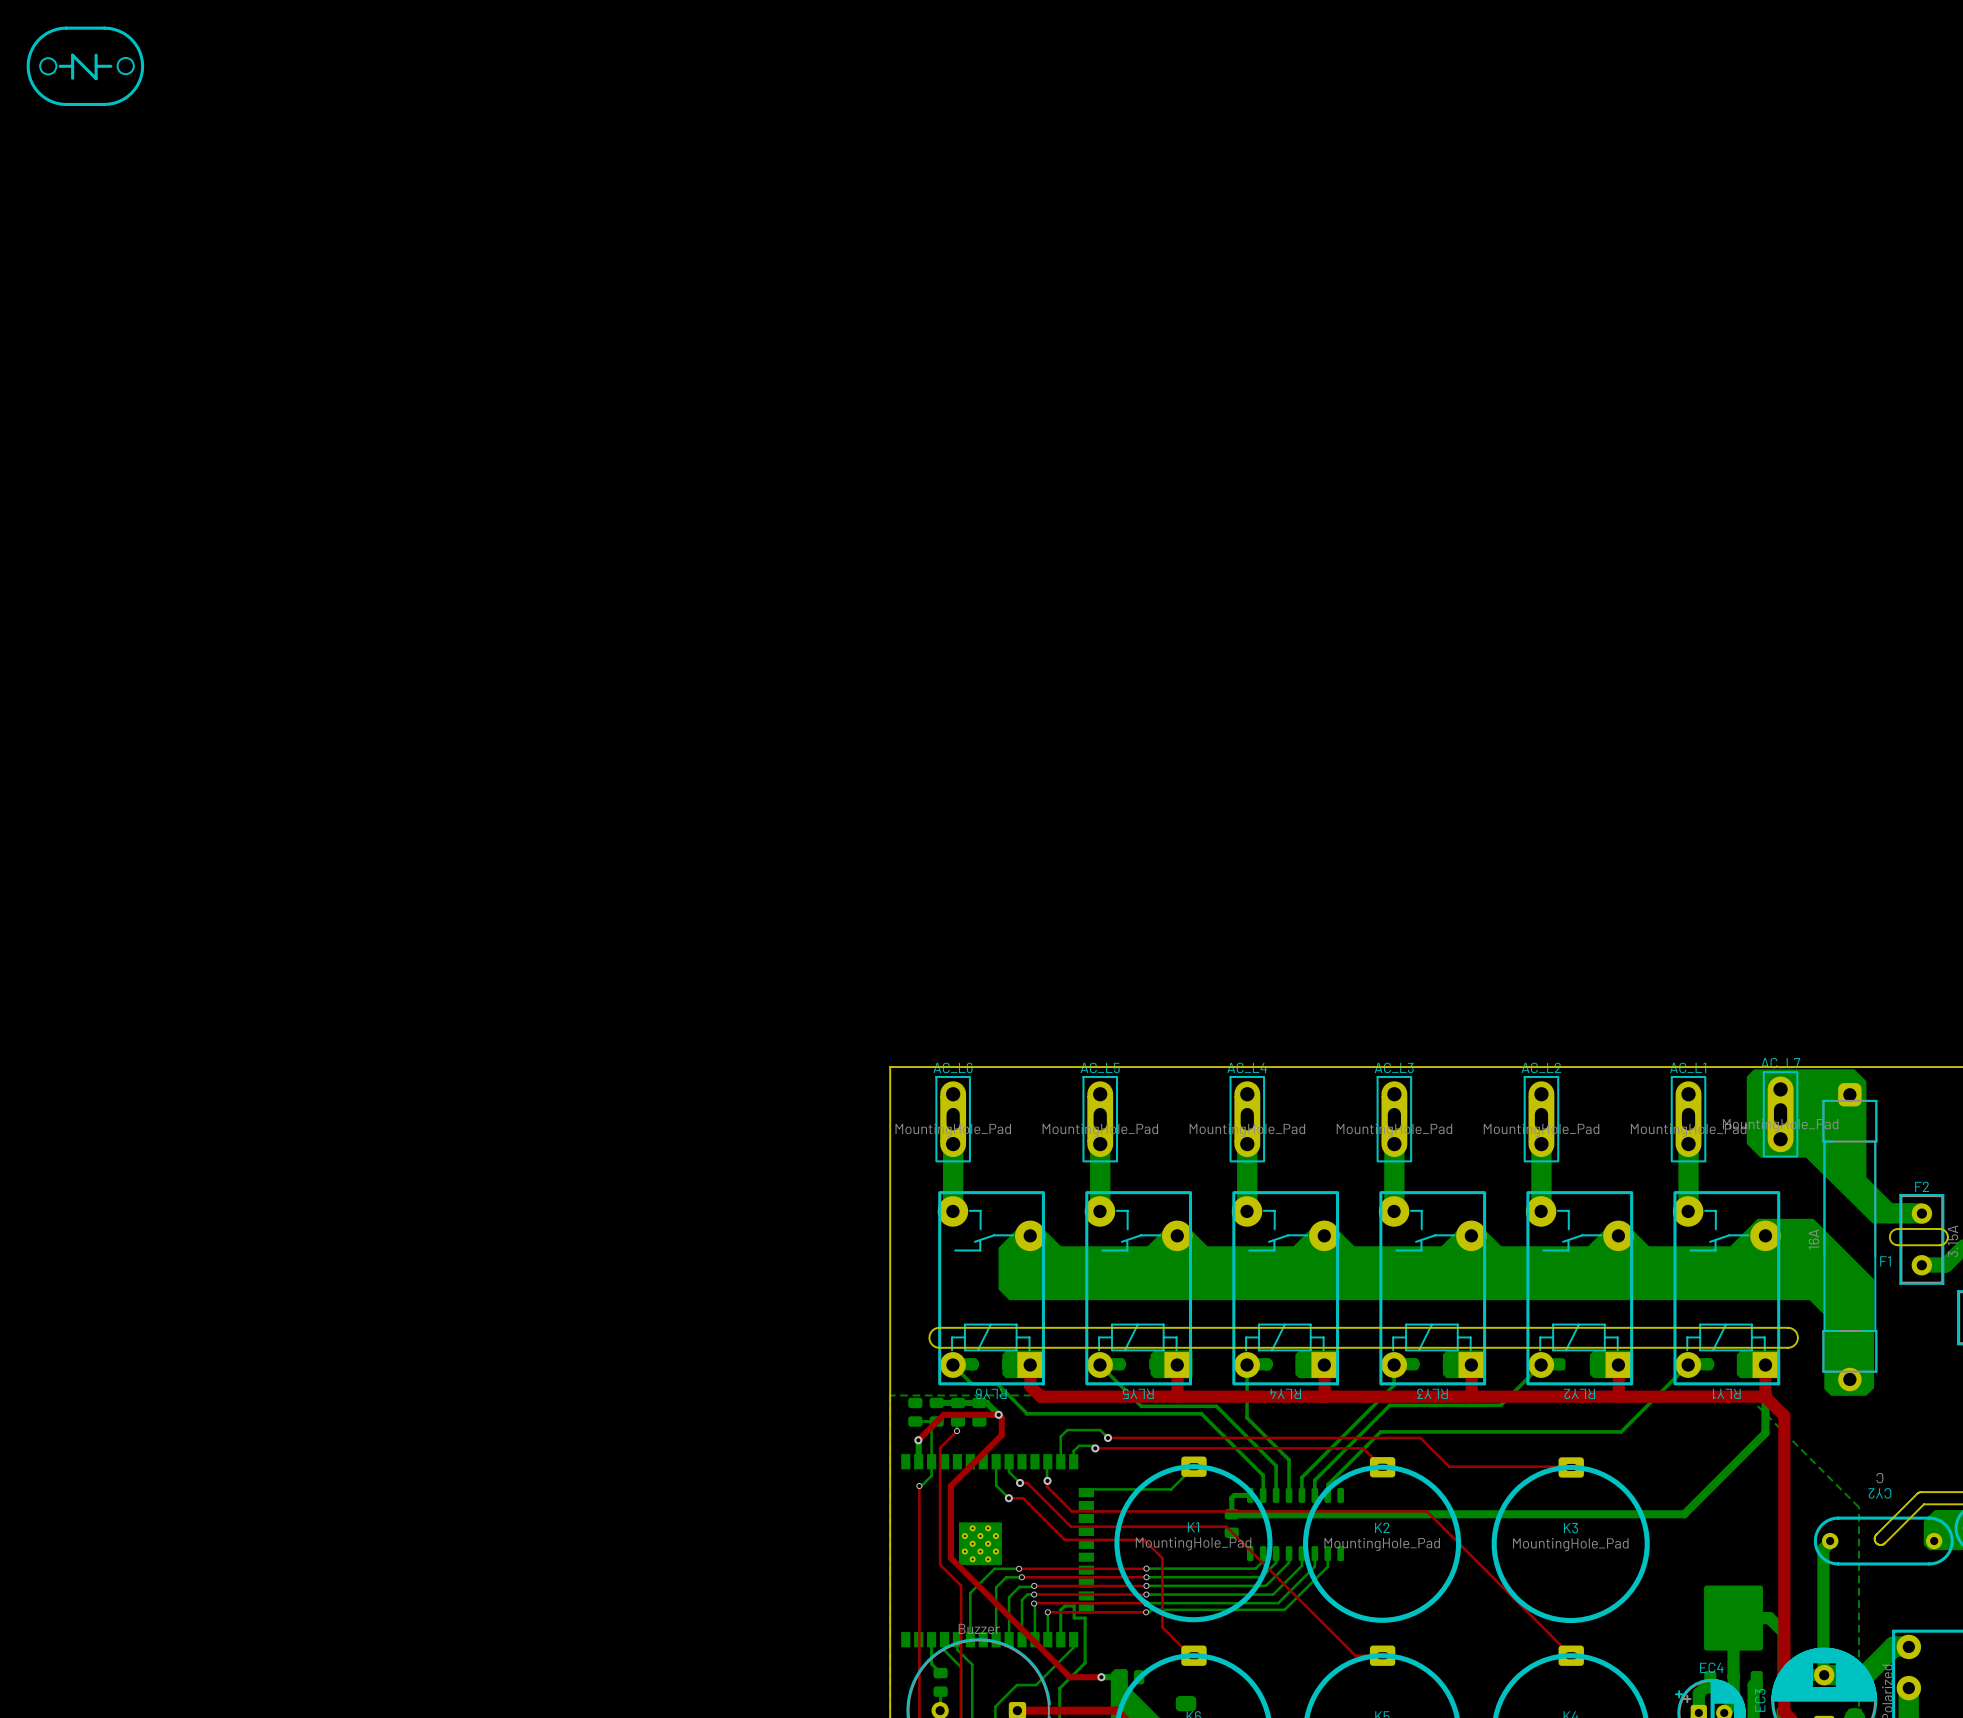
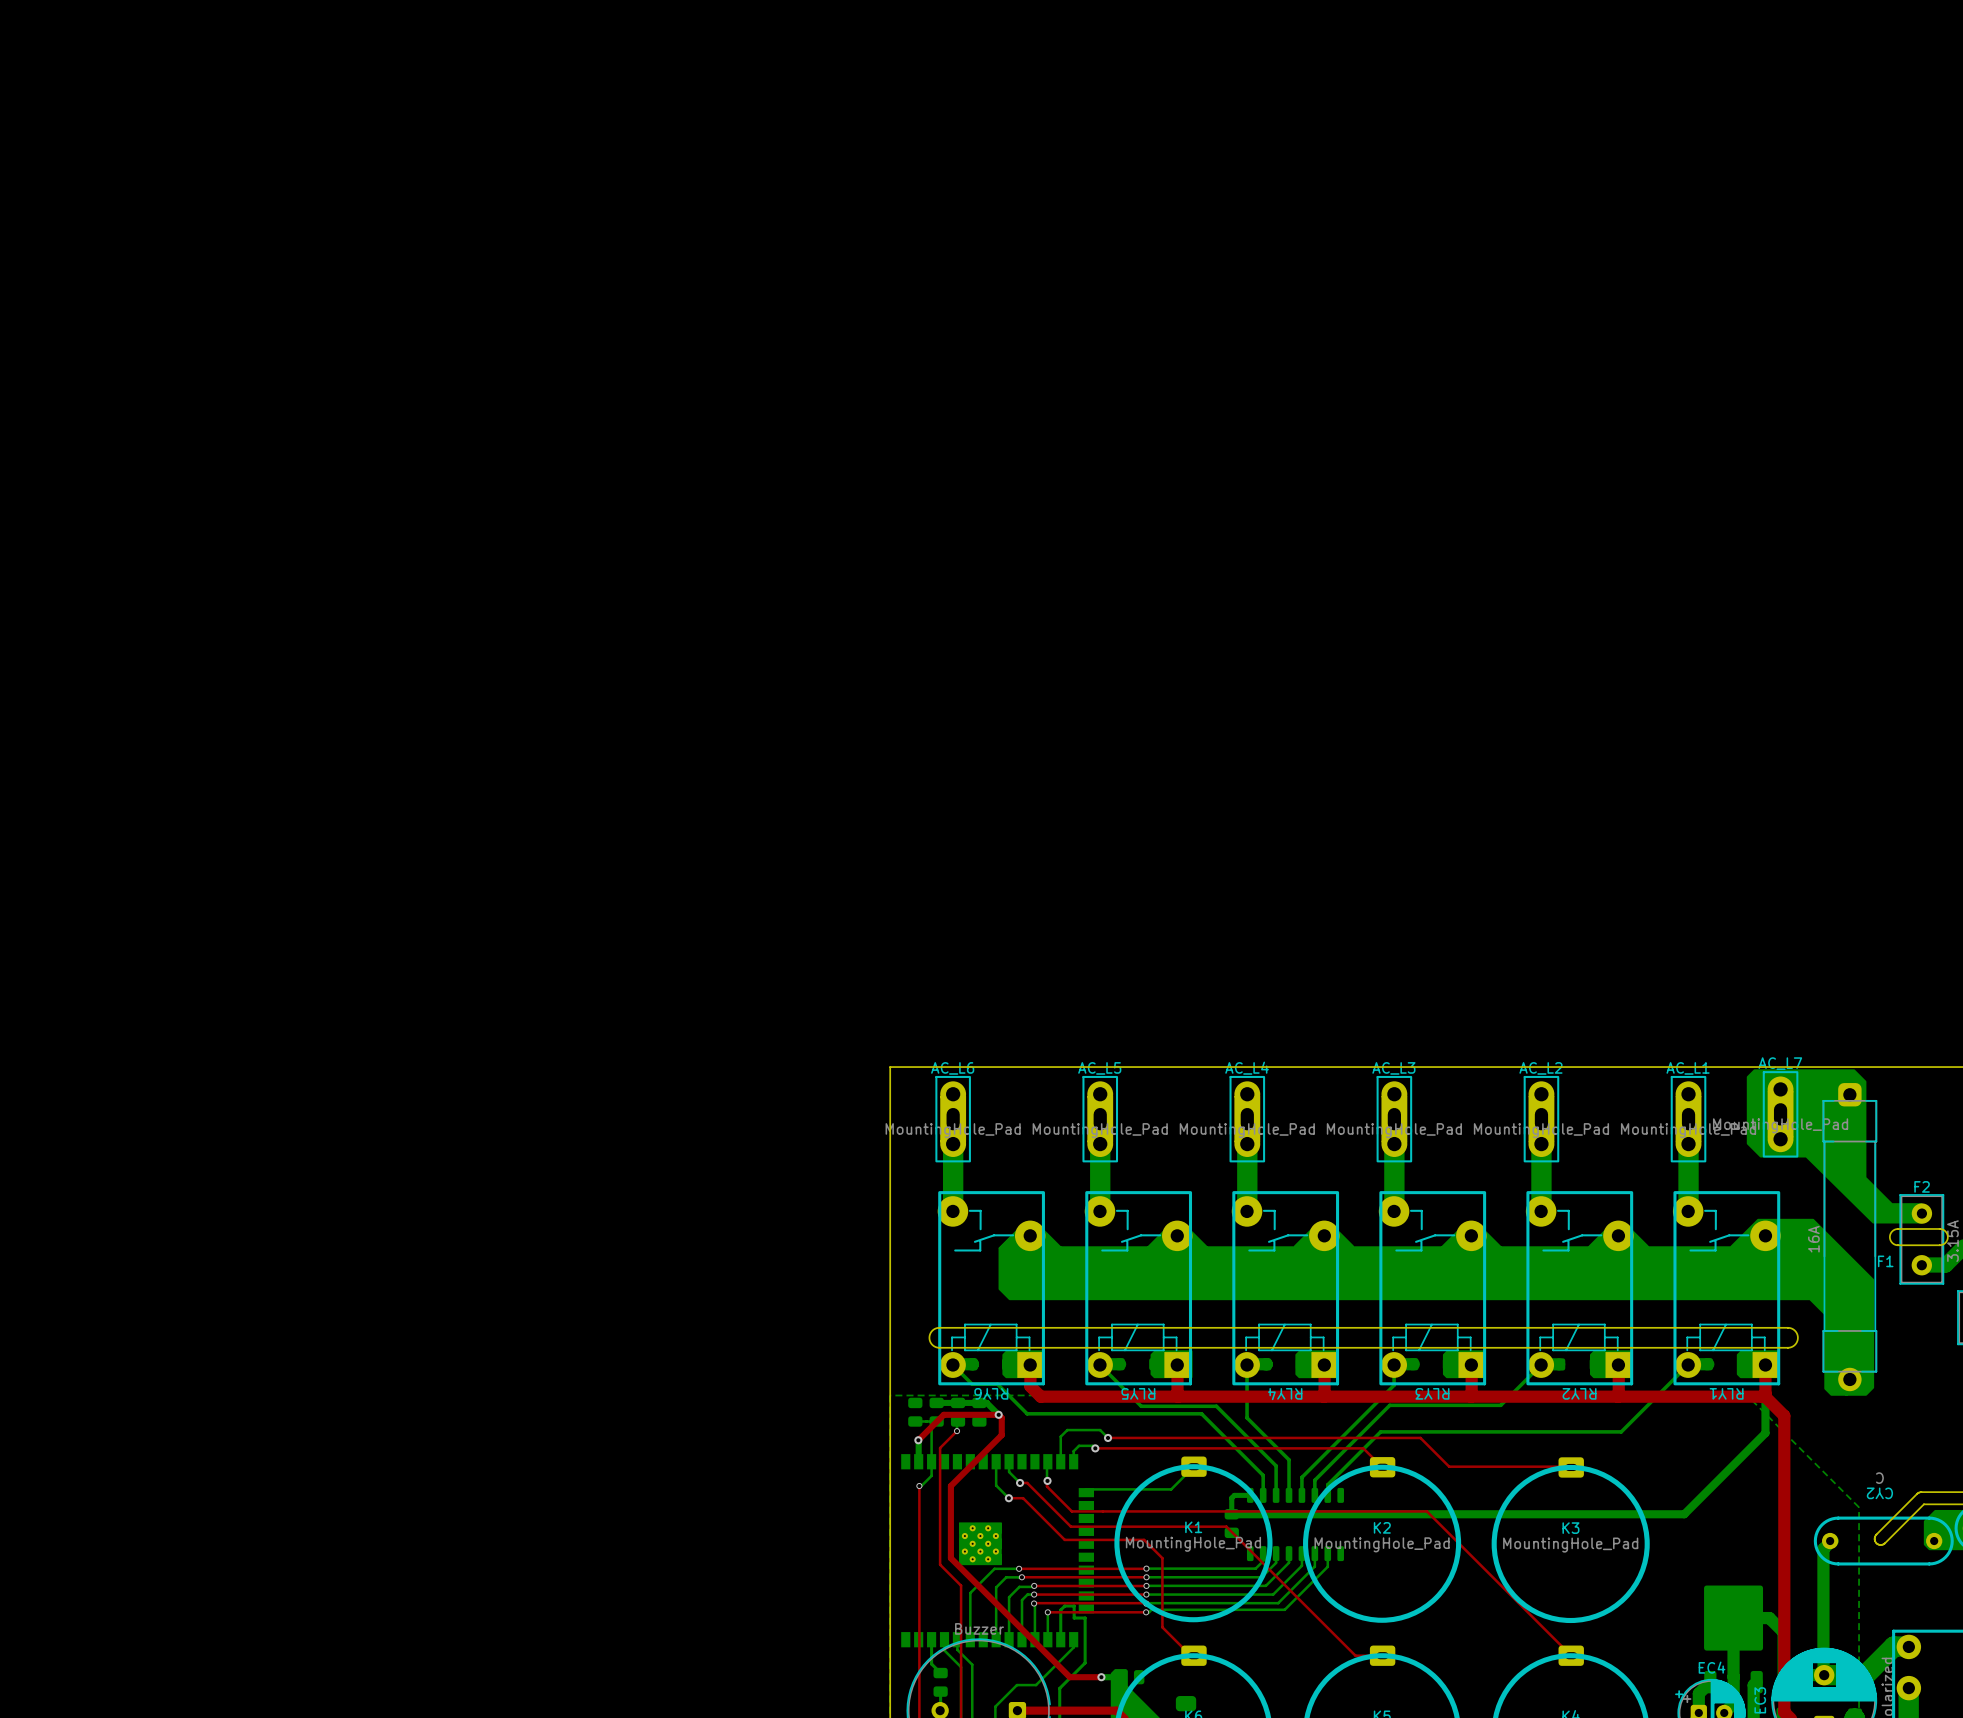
line: (66, 28) (109, 28) (123, 33) (131, 39) (139, 51) (142, 66) (139, 80) (131, 93) (119, 101) (104, 104) (61, 104) (48, 100) (40, 94) (34, 87) (29, 75) (28, 61) (30, 52) (34, 44) (44, 34) (52, 30) (66, 28) -> none
line: (96, 55) (96, 78) (72, 55) (72, 78) -> none
drawing: [39, 57, 57, 75] -> none
drawing: [117, 57, 135, 75] -> none
line: (60, 66) (72, 66) -> none
line: (96, 66) (110, 66) -> none

